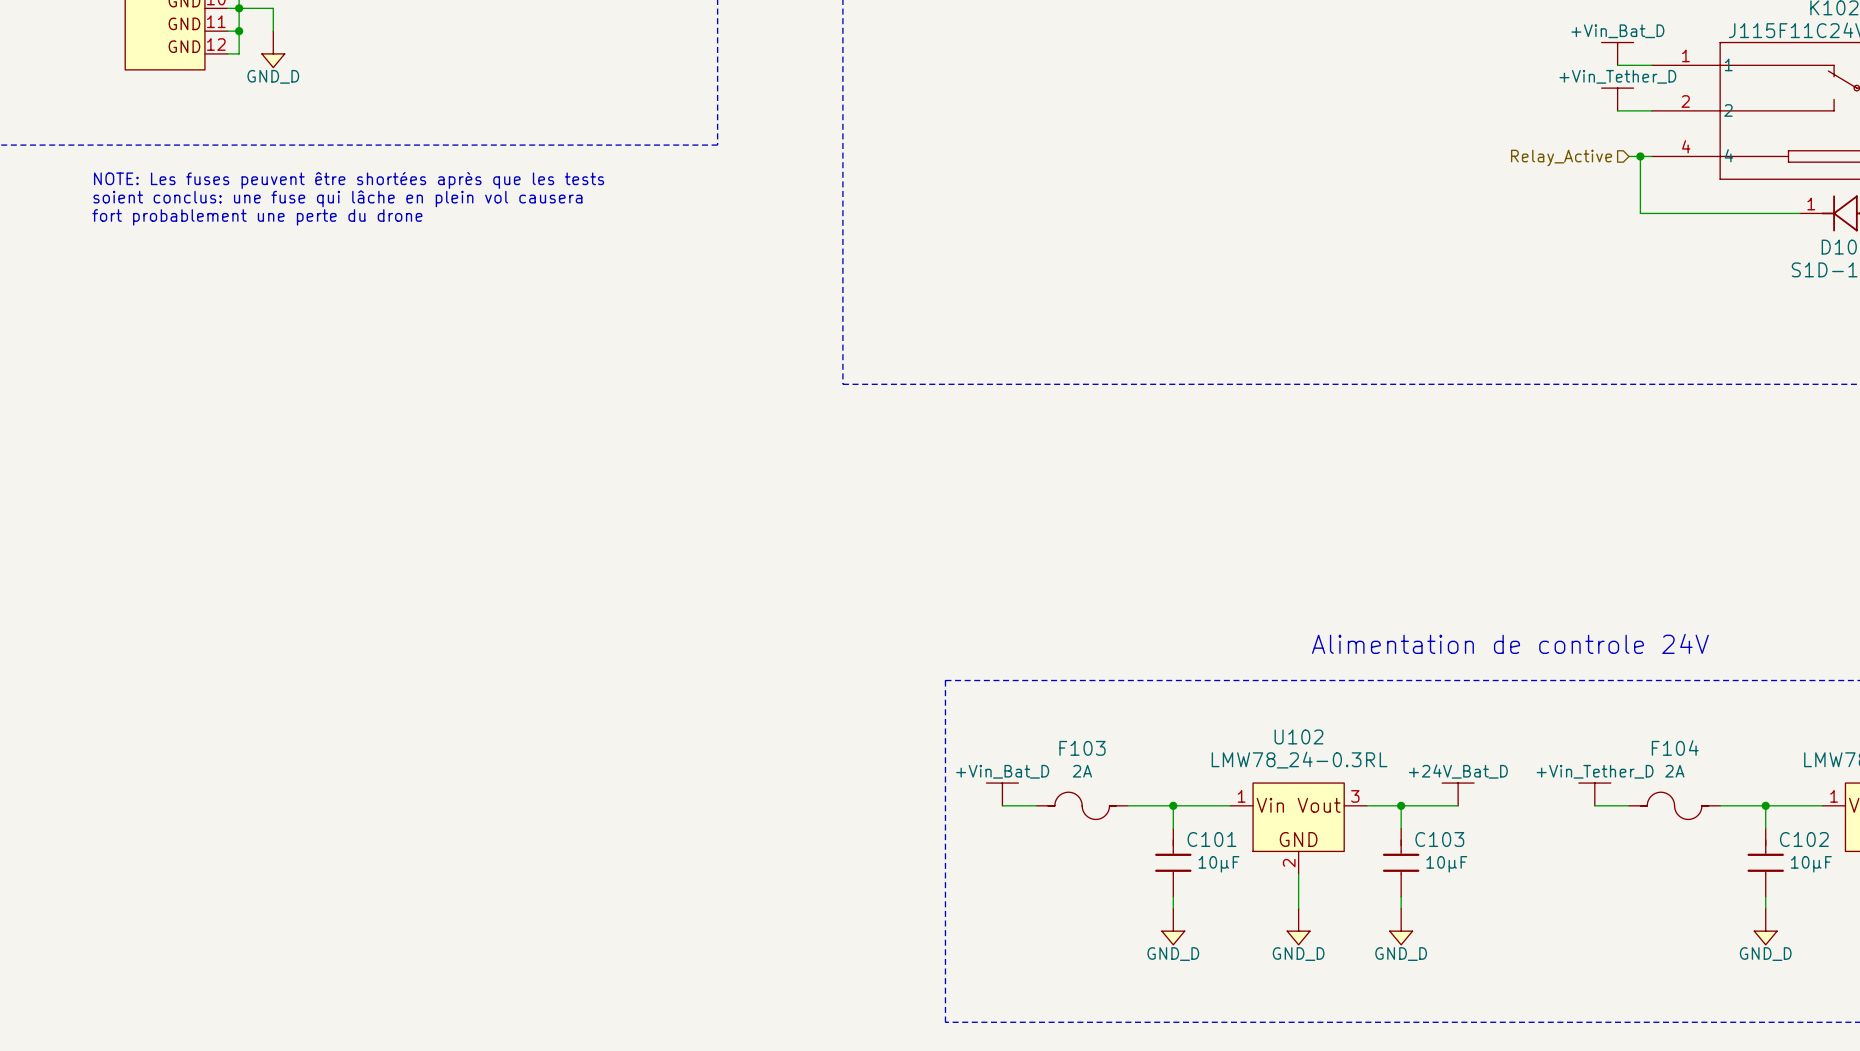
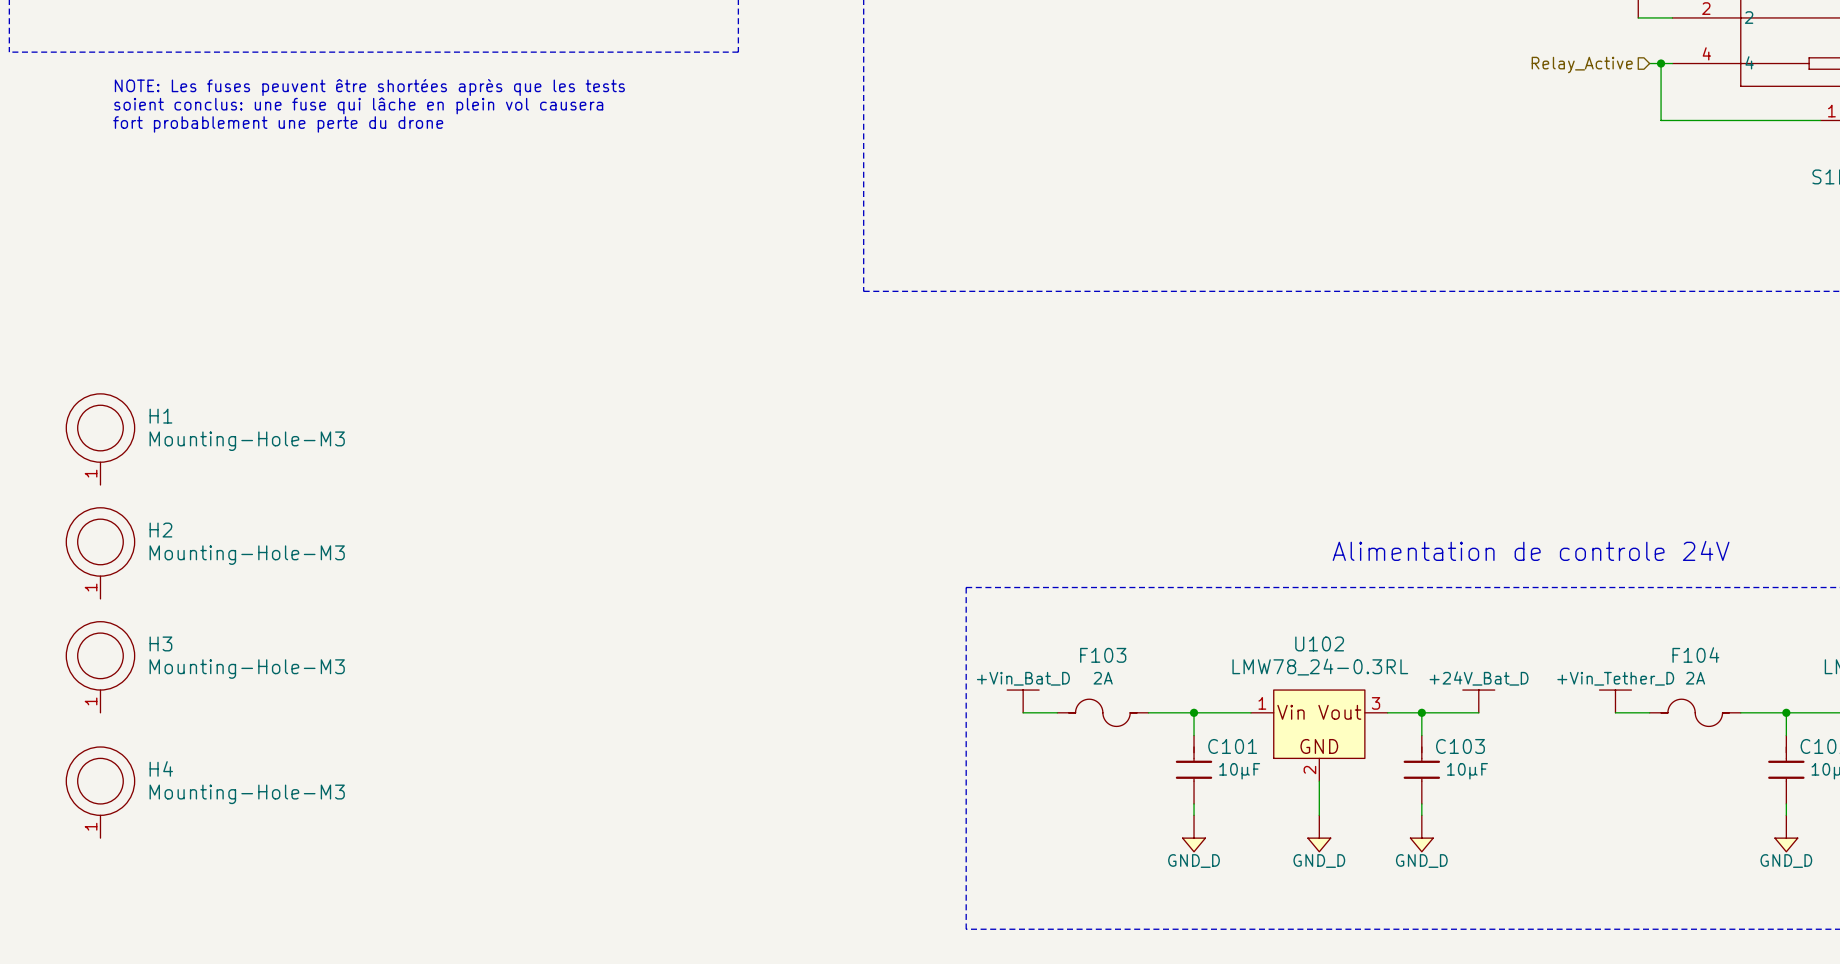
H1: none -> Mounting-Hole-M3 (100, 439)
H2: none -> Mounting-Hole-M3 (100, 553)
H3: none -> Mounting-Hole-M3 (100, 667)
H4: none -> Mounting-Hole-M3 (100, 792)

